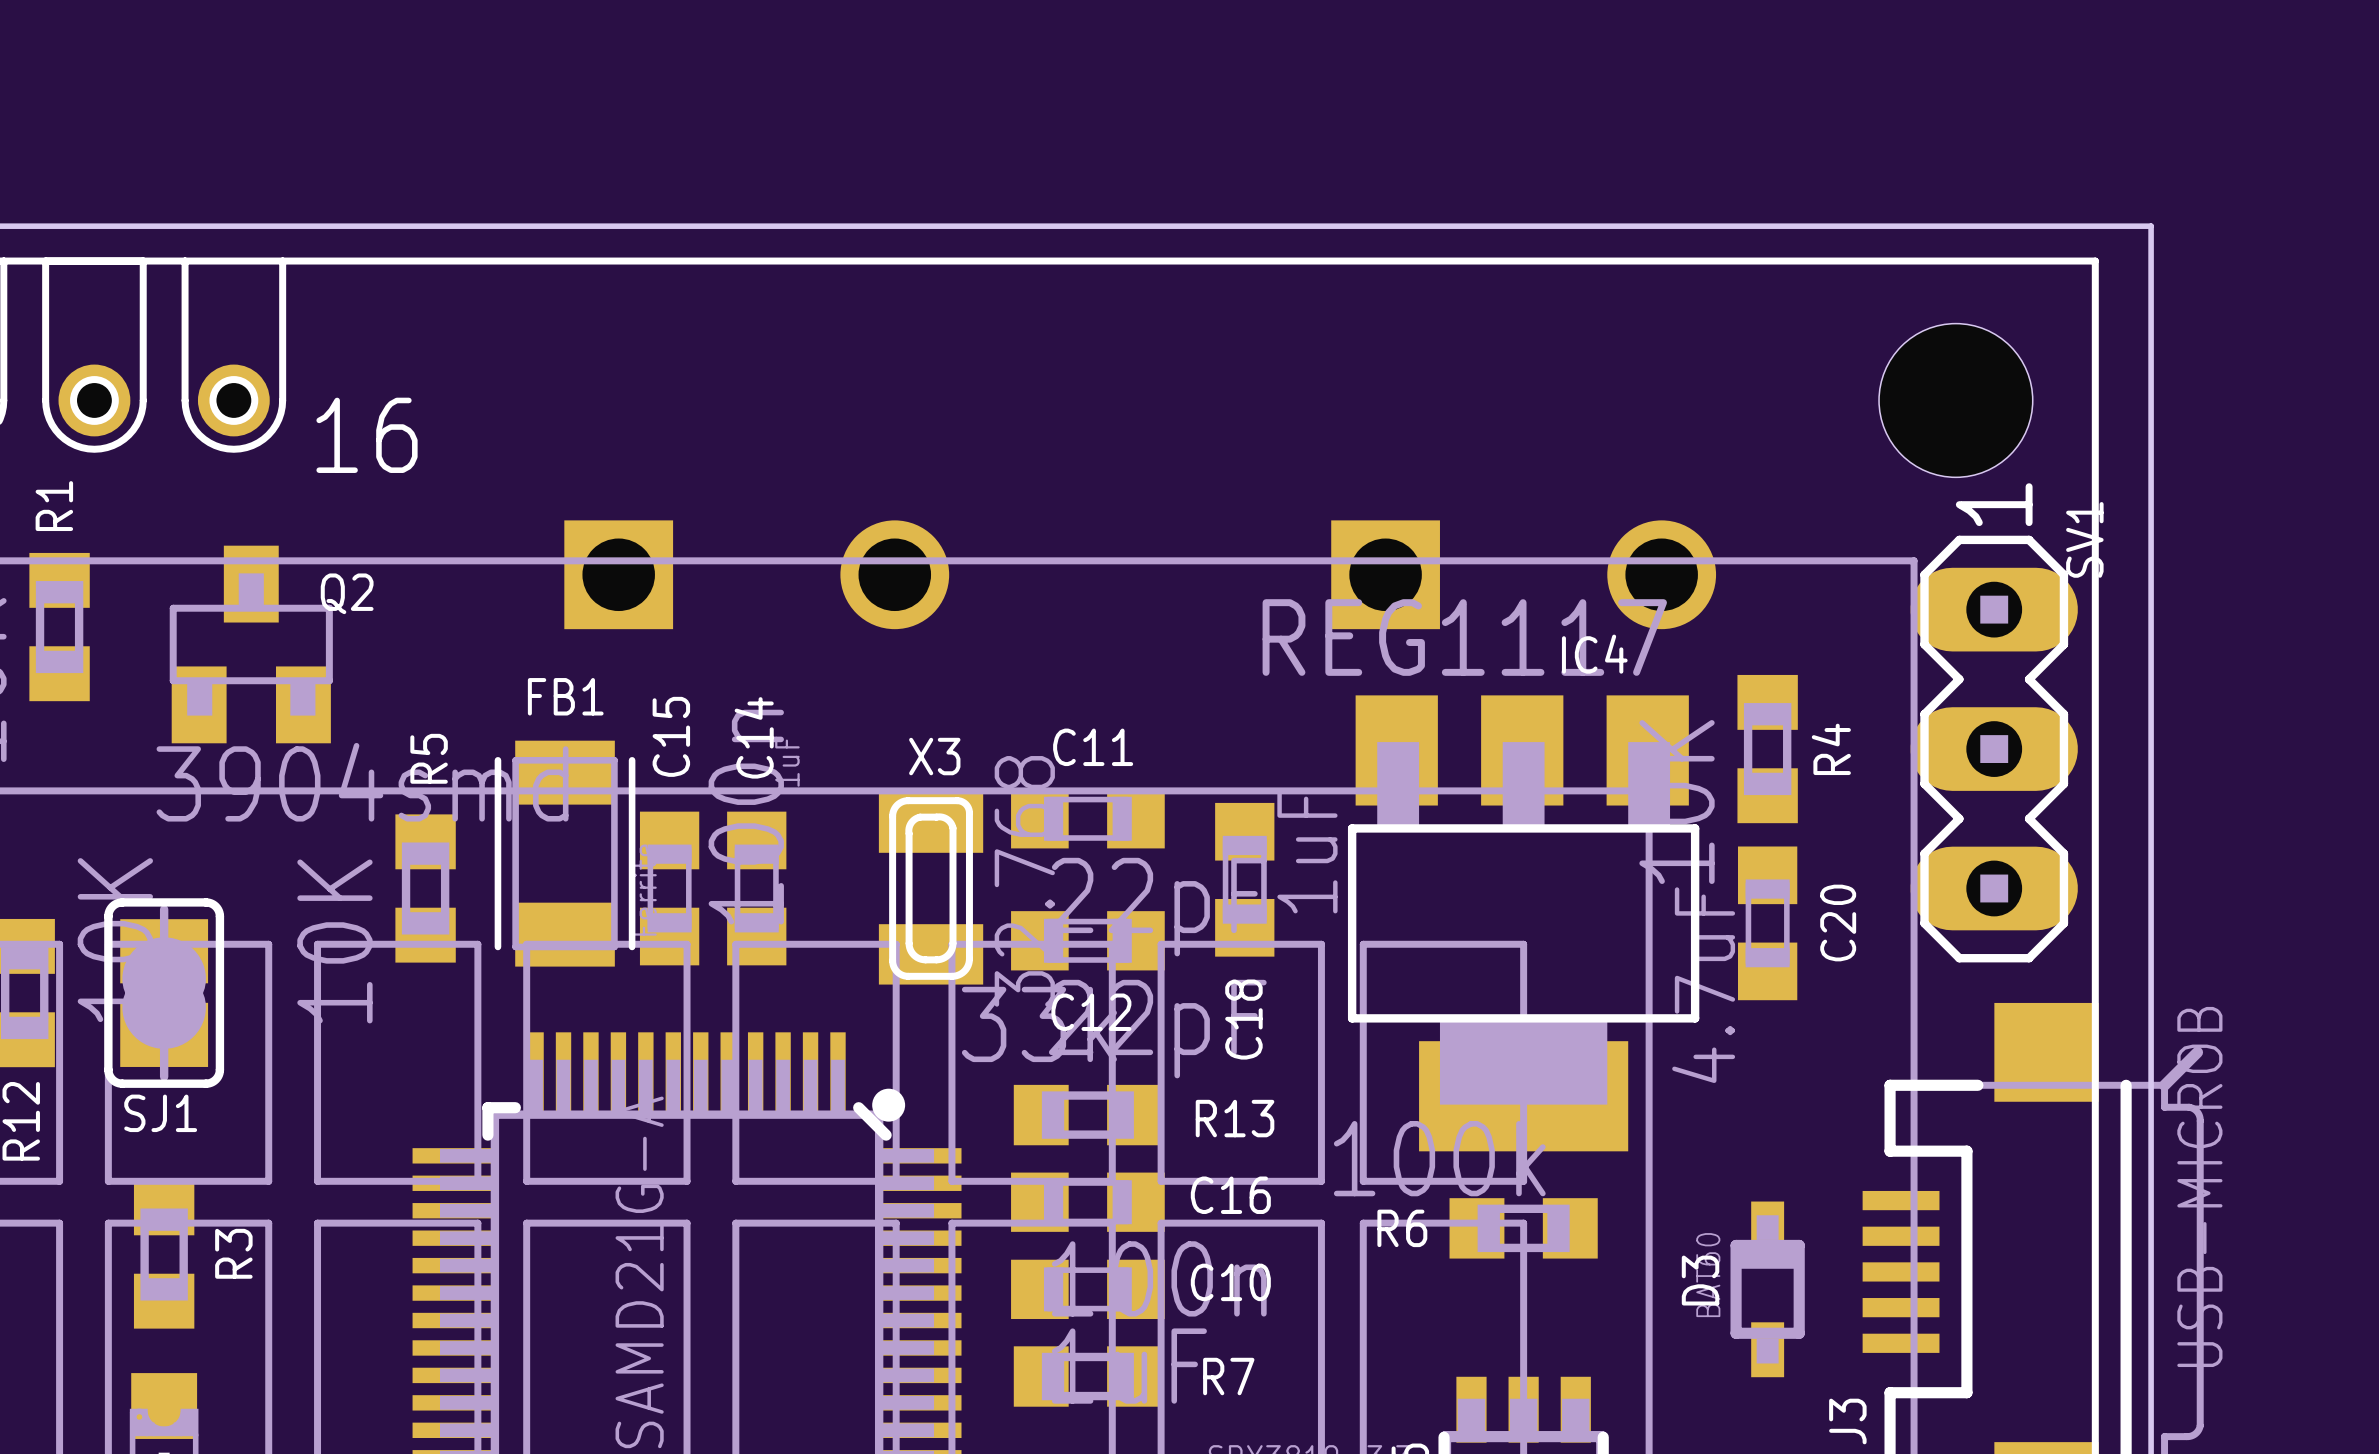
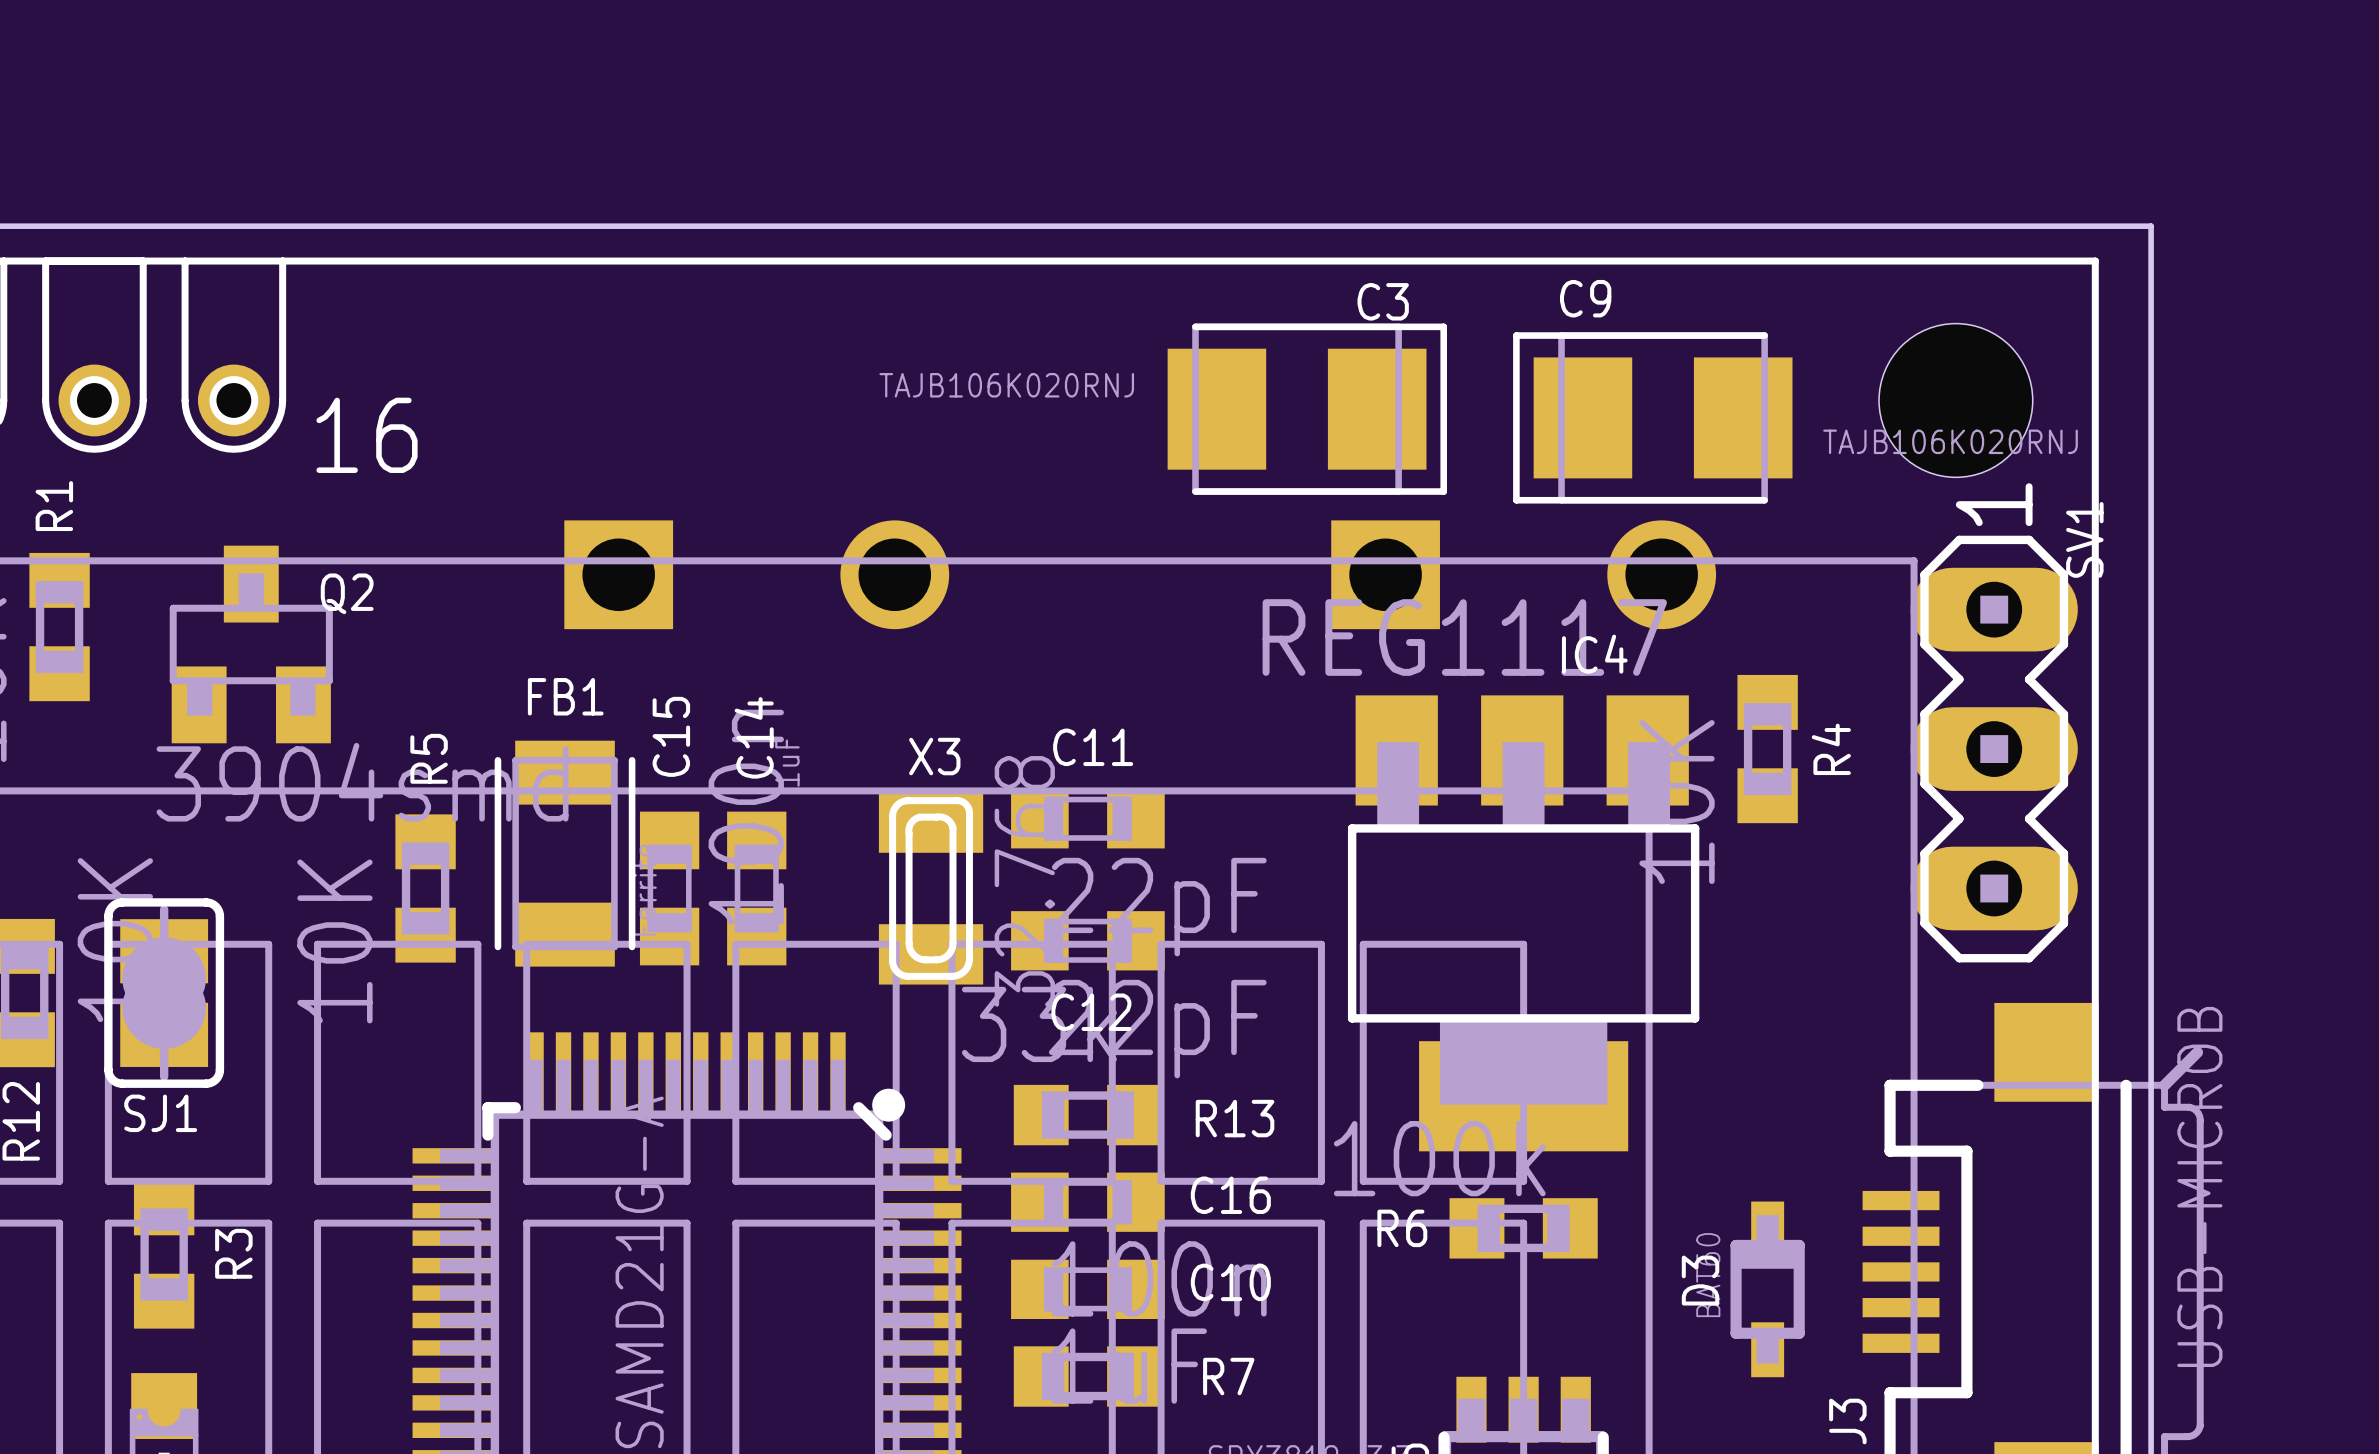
C3: none -> TAJB106K020RNJ (1307, 409)
C9: none -> TAJB106K020RNJ (1652, 417)
C18: 1uF (1244, 879) -> none
C20: 4.7uF (1767, 923) -> none

